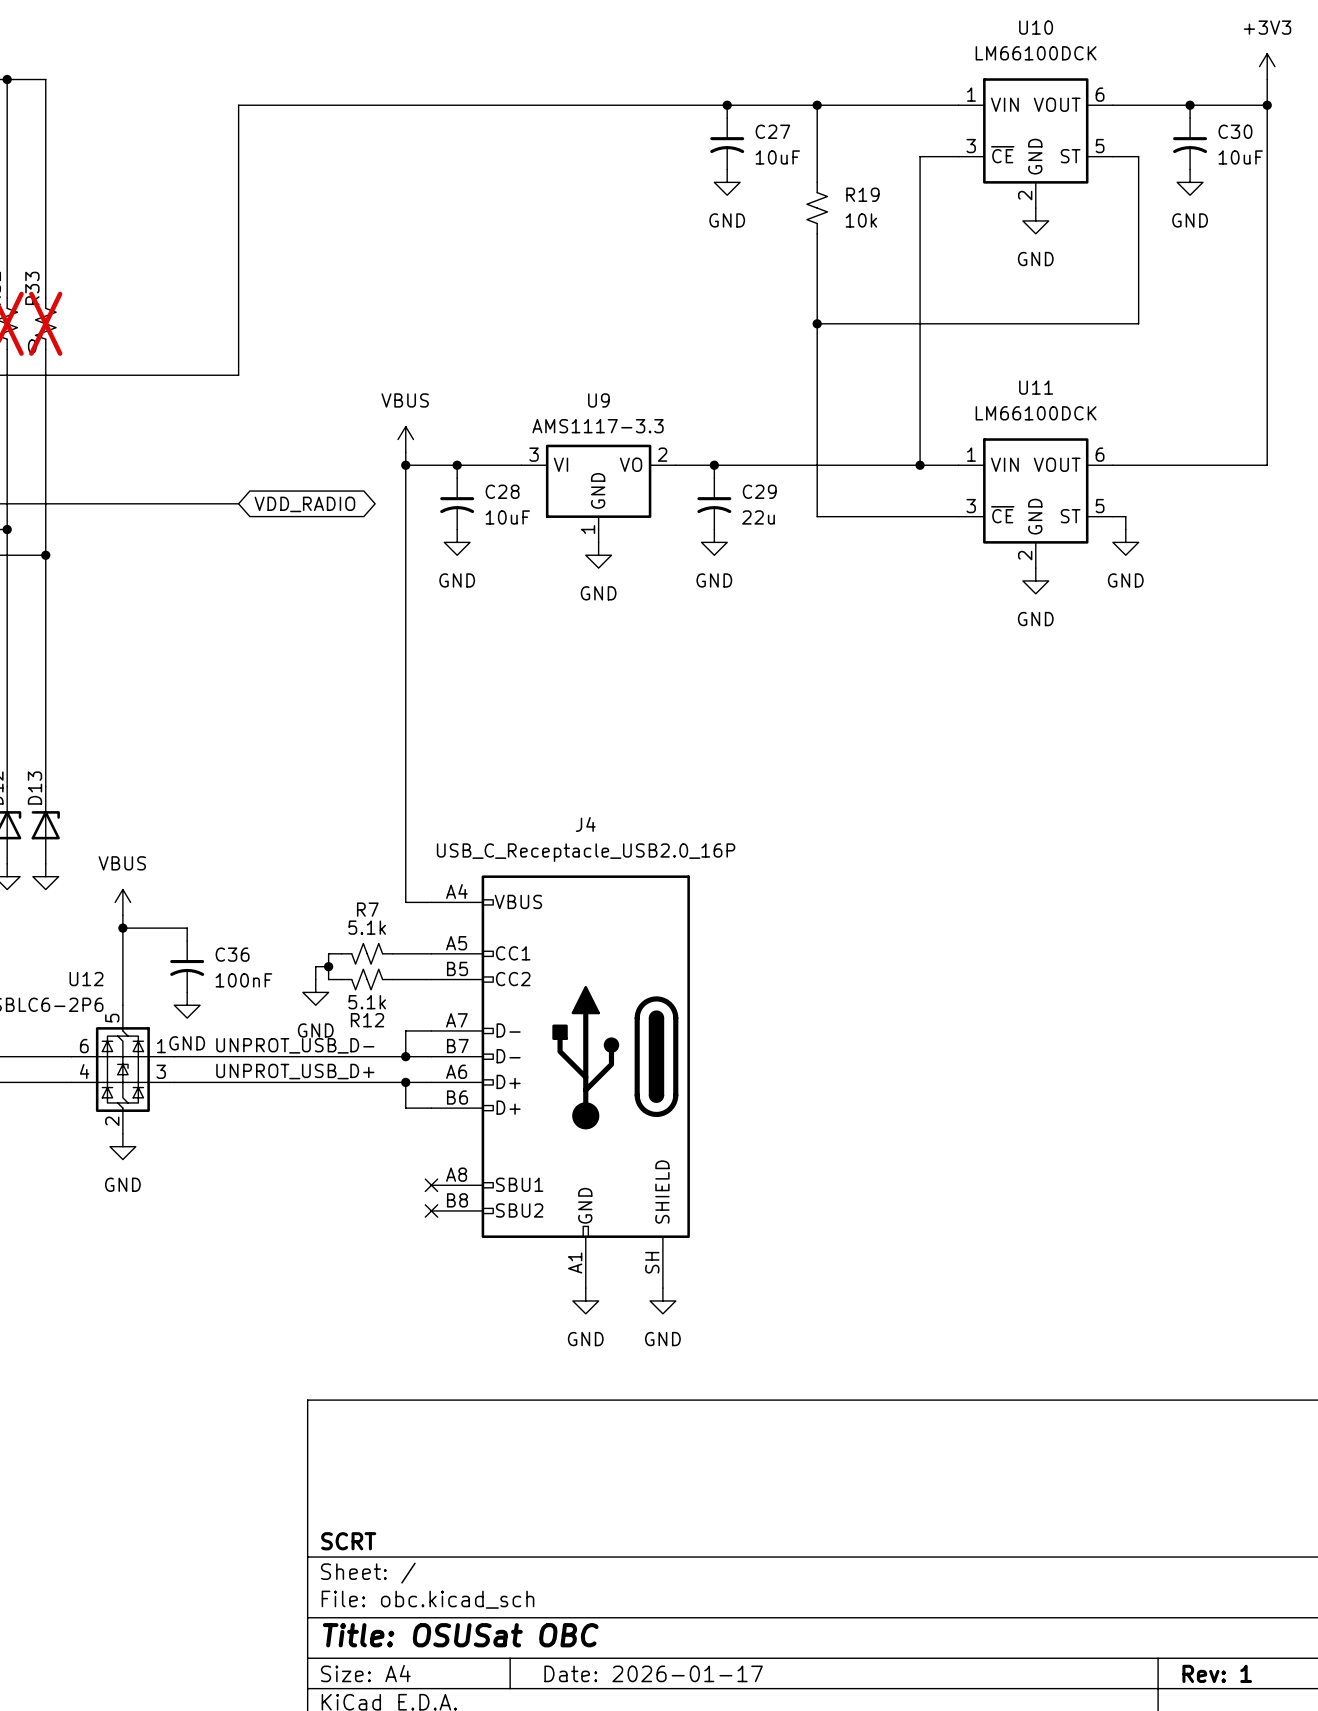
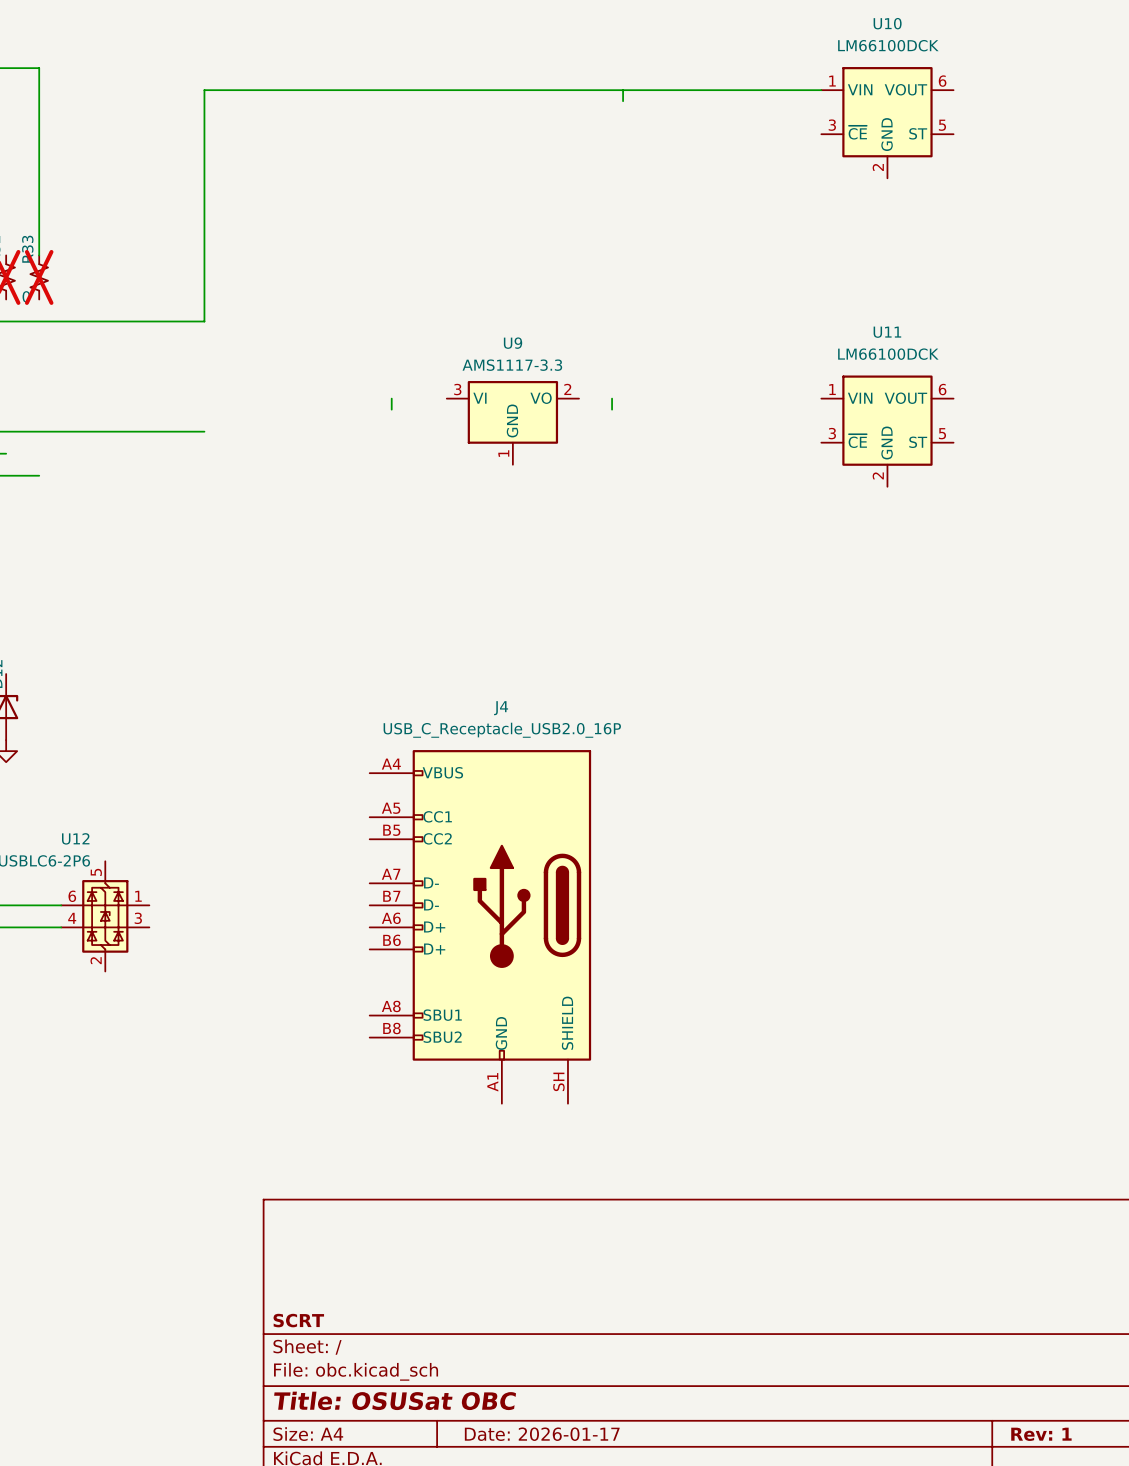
power symbol: +3V3 (1267, 66) -> none
wire: (7, 79) (7, 298) -> none
junction: (7, 79) -> none
wire: (1267, 79) (1267, 465) (1112, 465) -> none
junction: (727, 105) -> none
wire: (817, 105) (817, 182) -> none
junction: (817, 105) -> none
wire: (1112, 105) (1267, 105) -> none
wire: (1190, 105) (1190, 118) -> none
junction: (1190, 105) -> none
junction: (1267, 105) -> none
C27: 10uF (727, 143) -> none
C30: 10uF (1190, 143) -> none
wire: (958, 156) (920, 156) (920, 465) -> none
wire: (1112, 156) (1138, 156) (1138, 323) (817, 323) -> none
power symbol: GND (727, 182) -> none
power symbol: GND (1190, 182) -> none
R19: 10k (817, 208) -> none
power symbol: GND (1035, 220) -> none
wire: (817, 233) (817, 516) (958, 516) -> none
junction: (817, 323) -> none
wire: (7, 349) (7, 786) -> none
wire: (45, 349) (45, 786) -> none
power symbol: VBUS (405, 439) -> none
wire: (405, 452) (405, 902) (431, 902) -> none
wire: (405, 465) (521, 465) -> none
junction: (405, 465) -> none
junction: (457, 465) -> none
wire: (675, 465) (958, 465) -> none
junction: (714, 465) -> none
junction: (920, 465) -> none
C28: 10uF (457, 503) -> none
C29: 22u (714, 503) -> none
global label: VDD_RADIO (304, 504) -> none
wire: (1112, 516) (1125, 516) (1125, 529) -> none
junction: (7, 529) -> none
power symbol: GND (457, 542) -> none
power symbol: GND (714, 542) -> none
power symbol: GND (1125, 542) -> none
junction: (45, 555) -> none
power symbol: GND (598, 555) -> none
power symbol: GND (1035, 580) -> none
D13: (45, 825) -> none
power symbol: (45, 876) -> none
power symbol: VBUS (122, 902) -> none
wire: (122, 915) (122, 1005) -> none
wire: (122, 928) (187, 928) (187, 940) -> none
junction: (122, 928) -> none
wire: (341, 953) (328, 953) (328, 979) (341, 979) -> none
R7: 5.1k (367, 953) -> none
wire: (392, 953) (431, 953) -> none
C36: 100nF (187, 966) -> none
wire: (328, 966) (315, 966) (315, 979) -> none
junction: (328, 966) -> none
R12: 5.1k (367, 979) -> none
wire: (392, 979) (431, 979) -> none
power symbol: GND (315, 992) -> none
power symbol: GND (187, 1005) -> none
wire: (431, 1030) (405, 1030) (405, 1056) -> none
label: UNPROT_USB_D- (295, 1045) -> none
wire: (174, 1056) (431, 1056) -> none
junction: (405, 1056) -> none
label: UNPROT_USB_D+ (295, 1071) -> none
wire: (174, 1082) (431, 1082) -> none
wire: (405, 1082) (405, 1108) (431, 1108) -> none
junction: (405, 1082) -> none
power symbol: GND (122, 1146) -> none
no-connect mark: (431, 1185) -> none
no-connect mark: (431, 1210) -> none
power symbol: GND (585, 1300) -> none
power symbol: GND (662, 1300) -> none

